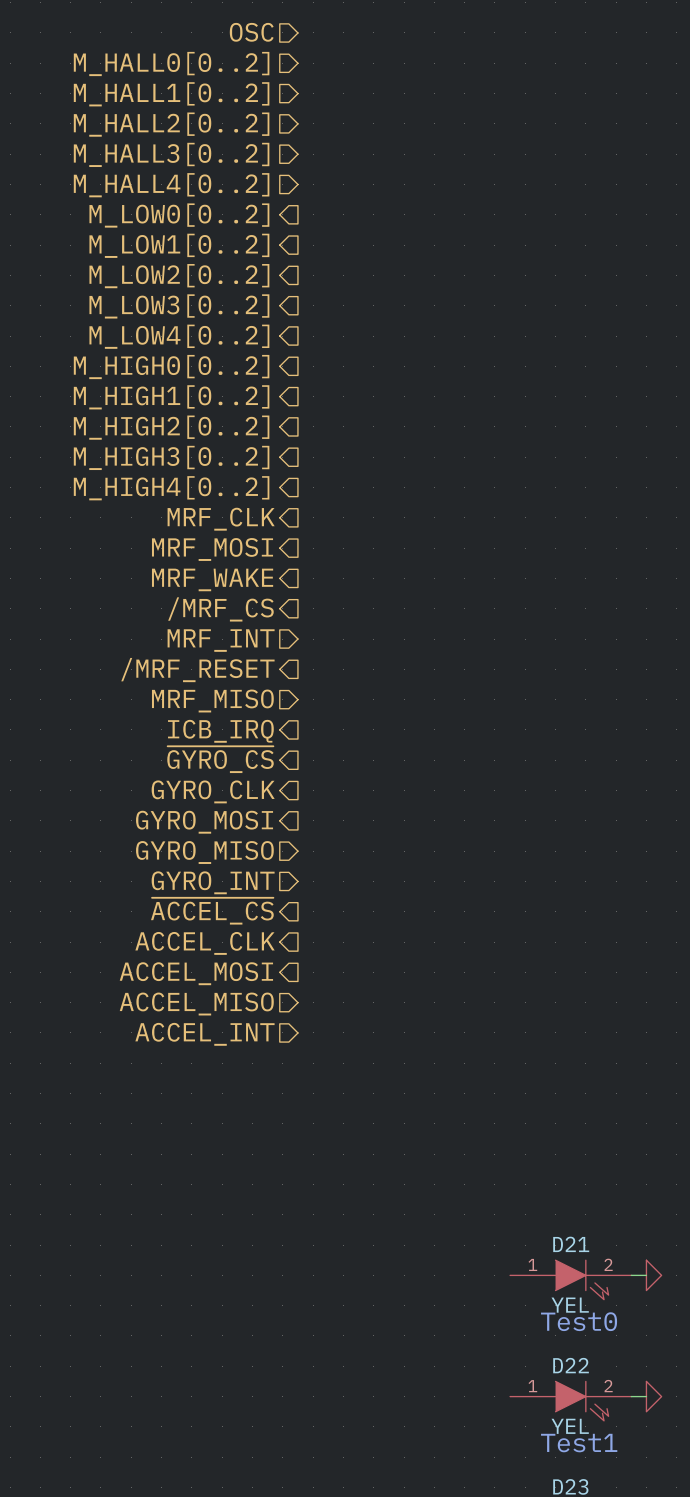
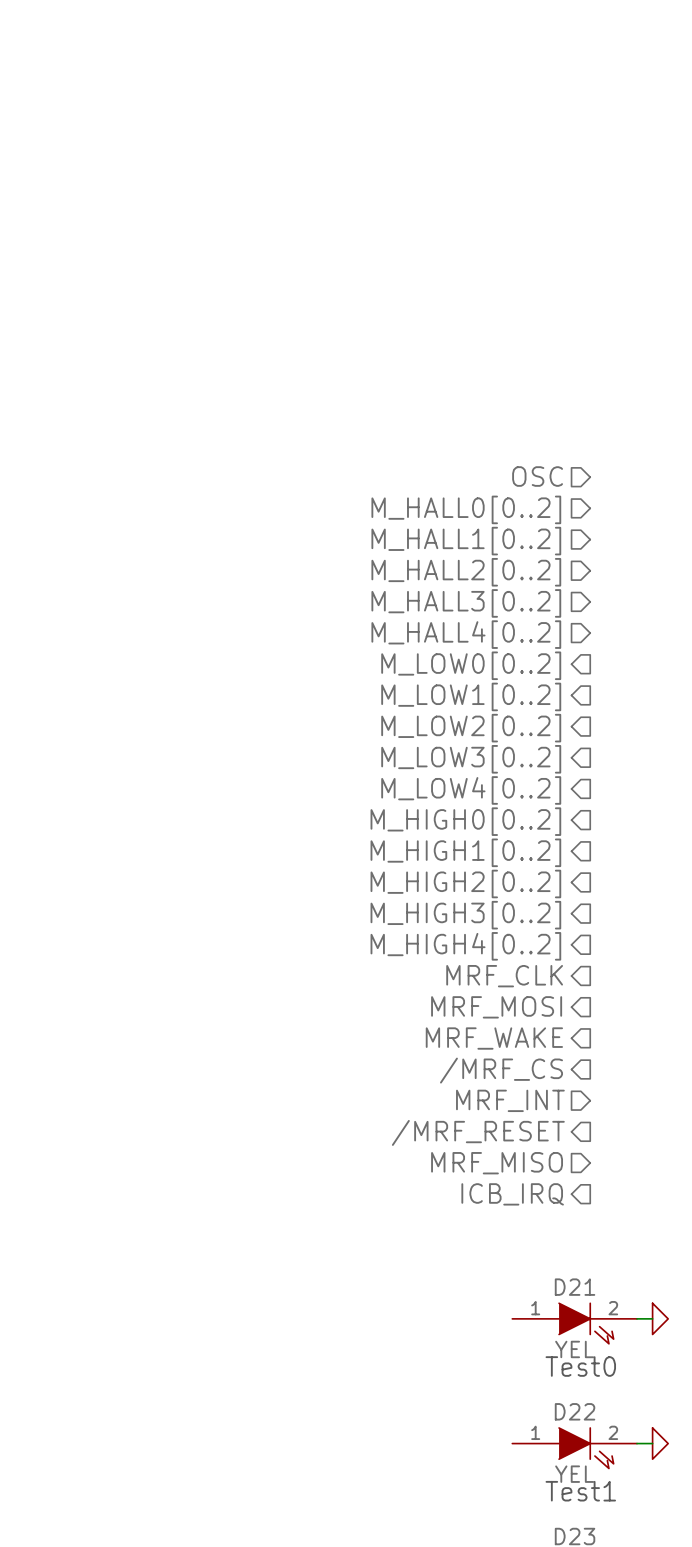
hierarchical label: OSC (251, 32) -> none
hierarchical label: M_HALL0[0..2] (171, 64) -> none
hierarchical label: M_HALL1[0..2] (171, 94) -> none
hierarchical label: M_HALL2[0..2] (171, 124) -> none
hierarchical label: M_HALL3[0..2] (171, 154) -> none
hierarchical label: M_HALL4[0..2] (171, 185) -> none
hierarchical label: M_LOW0[0..2] (179, 215) -> none
hierarchical label: M_LOW1[0..2] (179, 245) -> none
hierarchical label: M_LOW2[0..2] (179, 276) -> none
hierarchical label: M_LOW3[0..2] (179, 306) -> none
hierarchical label: M_LOW4[0..2] (179, 336) -> none
hierarchical label: M_HIGH0[0..2] (171, 367) -> none
hierarchical label: M_HIGH1[0..2] (171, 397) -> none
hierarchical label: M_HIGH2[0..2] (171, 427) -> none
hierarchical label: none -> OSC (537, 476)
hierarchical label: M_HIGH3[0..2] (171, 457) -> none
hierarchical label: M_HIGH4[0..2] (171, 488) -> none
hierarchical label: none -> M_HALL0[0..2] (466, 509)
hierarchical label: none -> M_HALL1[0..2] (466, 541)
hierarchical label: MRF_CLK (221, 519) -> none
hierarchical label: none -> M_HALL2[0..2] (466, 572)
hierarchical label: MRF_MOSI (212, 549) -> none
hierarchical label: MRF_WAKE (212, 579) -> none
hierarchical label: none -> M_HALL3[0..2] (466, 603)
hierarchical label: /MRF_CS (220, 609) -> none
hierarchical label: none -> M_HALL4[0..2] (466, 634)
hierarchical label: none -> M_LOW0[0..2] (471, 665)
hierarchical label: MRF_INT (221, 640) -> none
hierarchical label: /MRF_RESET (197, 670) -> none
hierarchical label: none -> M_LOW1[0..2] (471, 696)
hierarchical label: none -> M_LOW2[0..2] (471, 728)
hierarchical label: MRF_MISO (212, 701) -> none
hierarchical label: none -> M_LOW3[0..2] (471, 759)
hierarchical label: ICB_IRQ (220, 731) -> none
hierarchical label: ~{GYRO_CS} (220, 759) -> none
hierarchical label: none -> M_LOW4[0..2] (471, 790)
hierarchical label: GYRO_CLK (213, 791) -> none
hierarchical label: none -> M_HIGH0[0..2] (465, 821)
hierarchical label: none -> M_HIGH1[0..2] (465, 852)
hierarchical label: GYRO_MOSI (204, 822) -> none
hierarchical label: none -> M_HIGH2[0..2] (465, 883)
hierarchical label: GYRO_MISO (204, 852) -> none
hierarchical label: GYRO_INT (213, 882) -> none
hierarchical label: none -> M_HIGH3[0..2] (465, 915)
hierarchical label: ~{ACCEL_CS} (212, 911) -> none
hierarchical label: none -> M_HIGH4[0..2] (465, 946)
hierarchical label: ACCEL_CLK (205, 943) -> none
hierarchical label: none -> MRF_CLK (504, 976)
hierarchical label: ACCEL_MOSI (196, 973) -> none
hierarchical label: none -> MRF_MOSI (496, 1007)
hierarchical label: ACCEL_MISO (196, 1004) -> none
hierarchical label: none -> MRF_WAKE (494, 1038)
hierarchical label: none -> /MRF_CS (501, 1070)
hierarchical label: ACCEL_INT (204, 1034) -> none
hierarchical label: none -> MRF_INT (510, 1100)
hierarchical label: none -> /MRF_RESET (478, 1132)
hierarchical label: none -> MRF_MISO (497, 1163)
hierarchical label: none -> ICB_IRQ (512, 1194)

